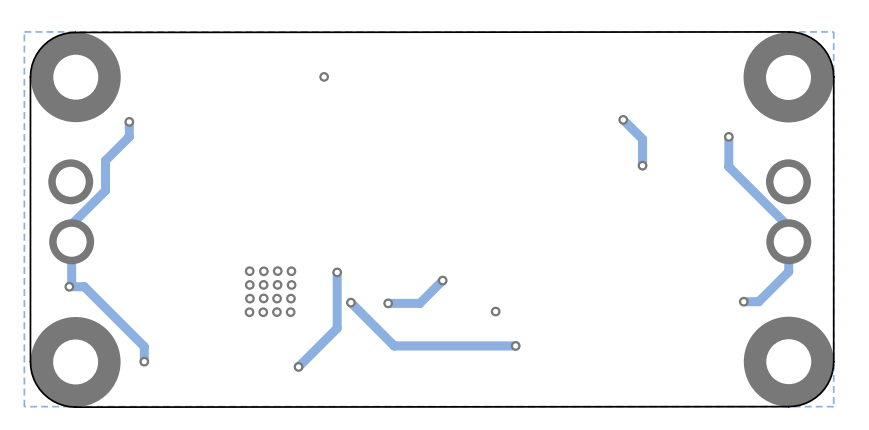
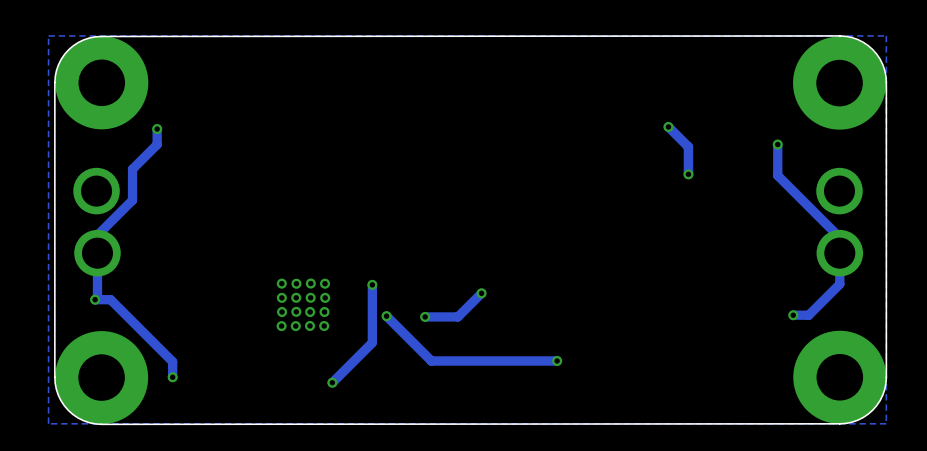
via: (324, 76) -> none
via: (495, 311) -> none

